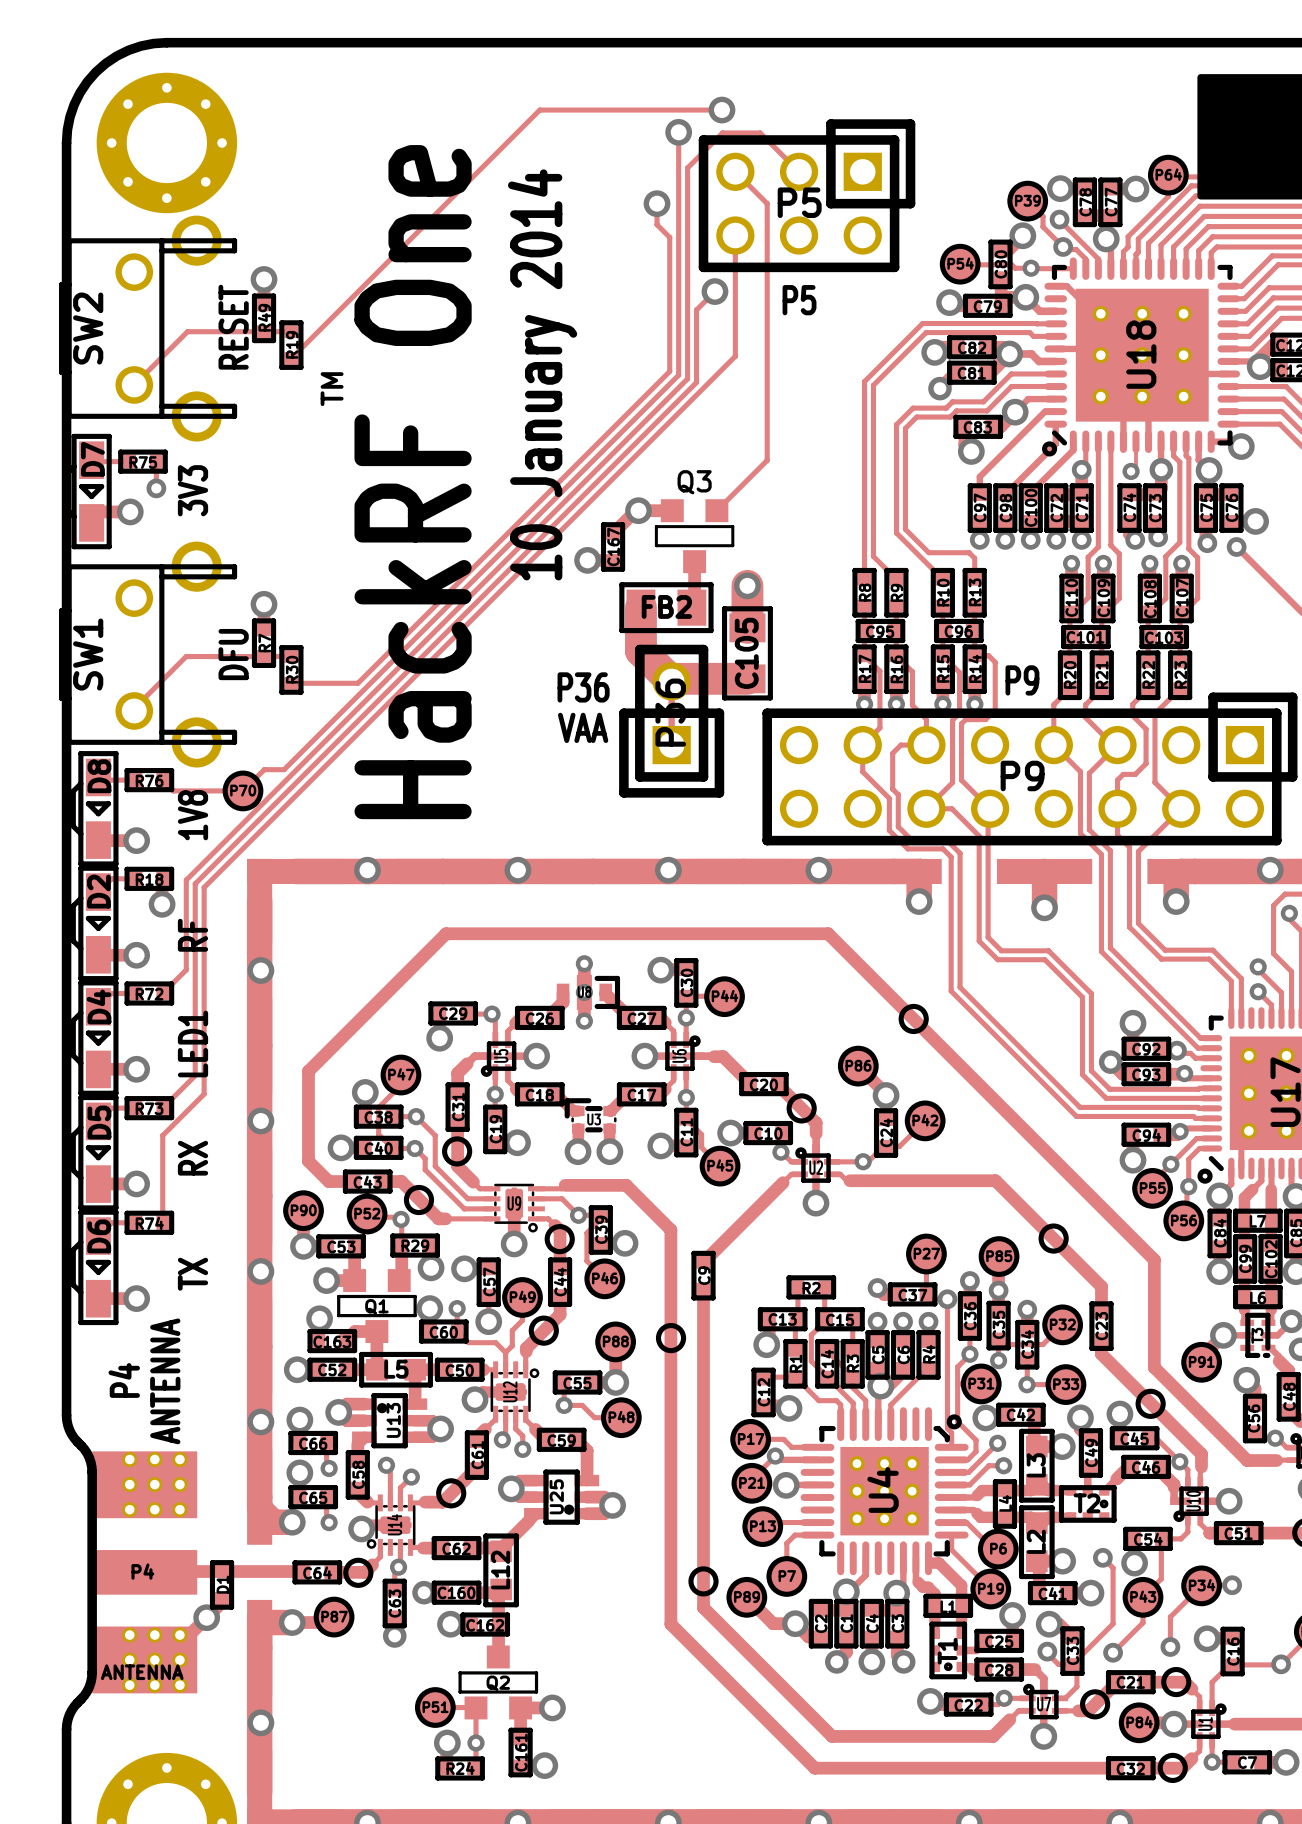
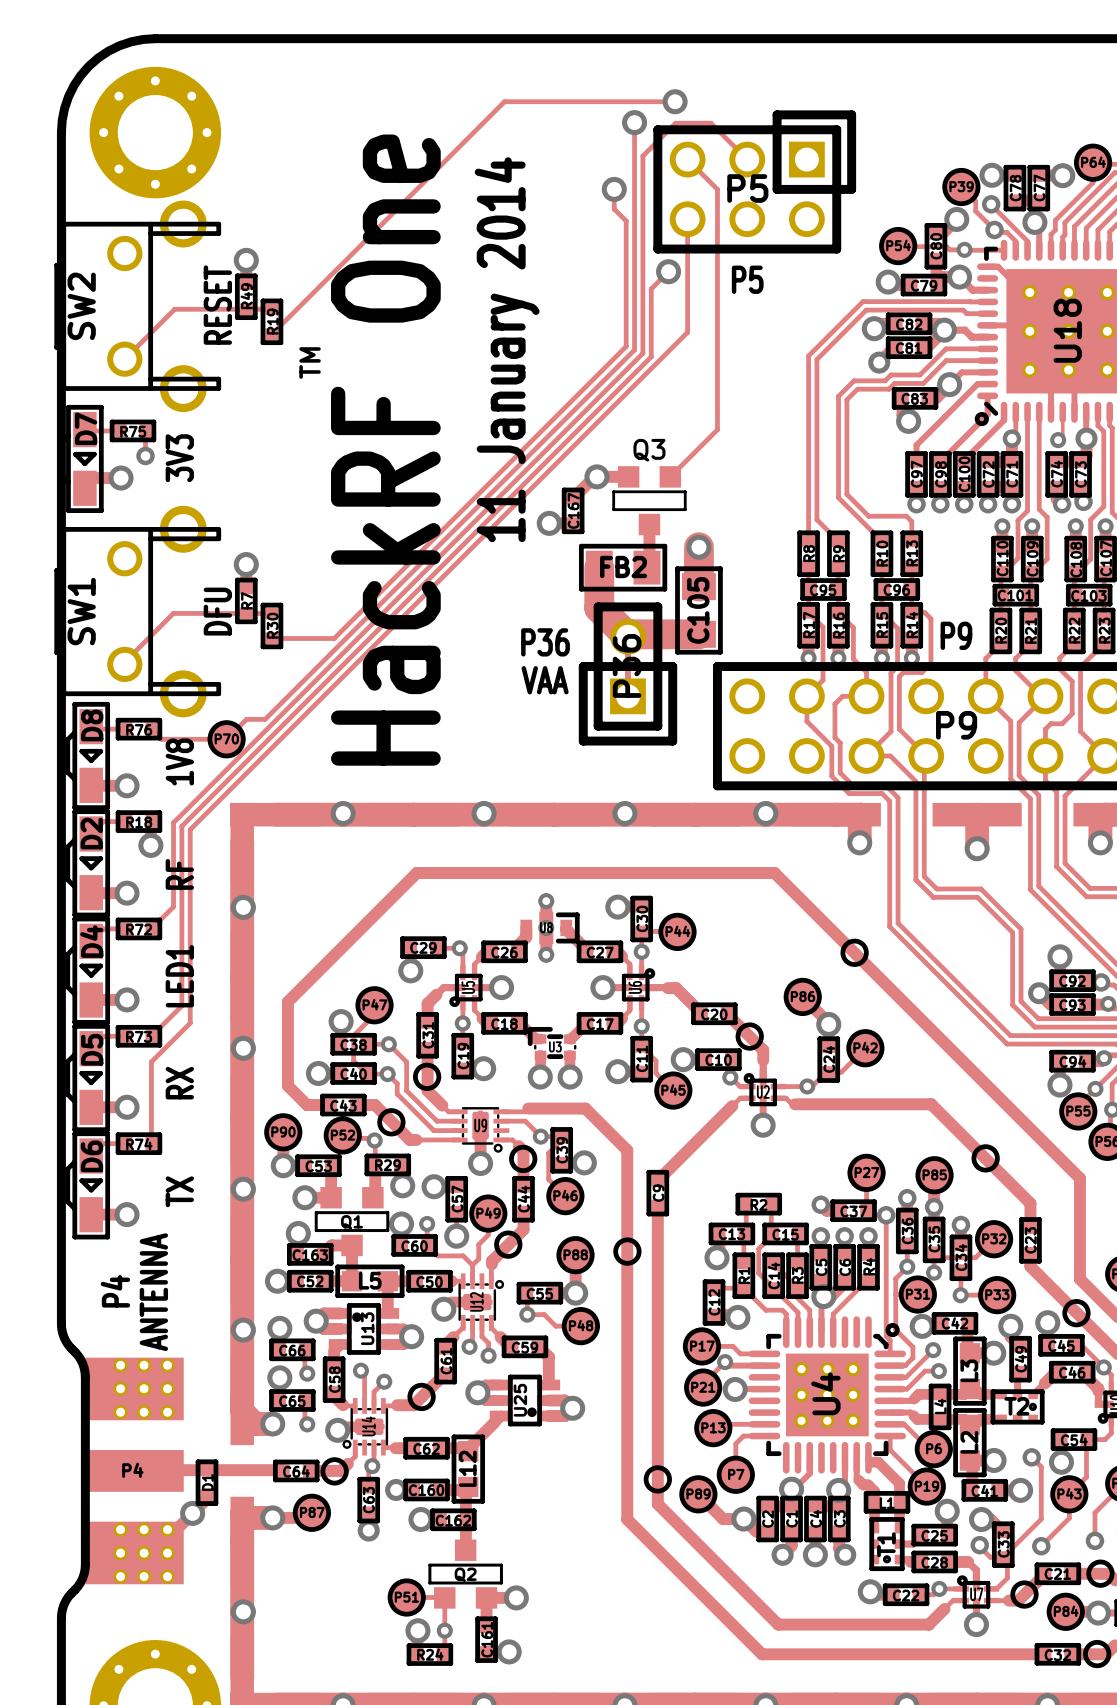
text: 10 January 2014 (542, 374) -> 11 January 2014 (507, 349)
P4 value: ANTENNA (142, 1672) -> none

